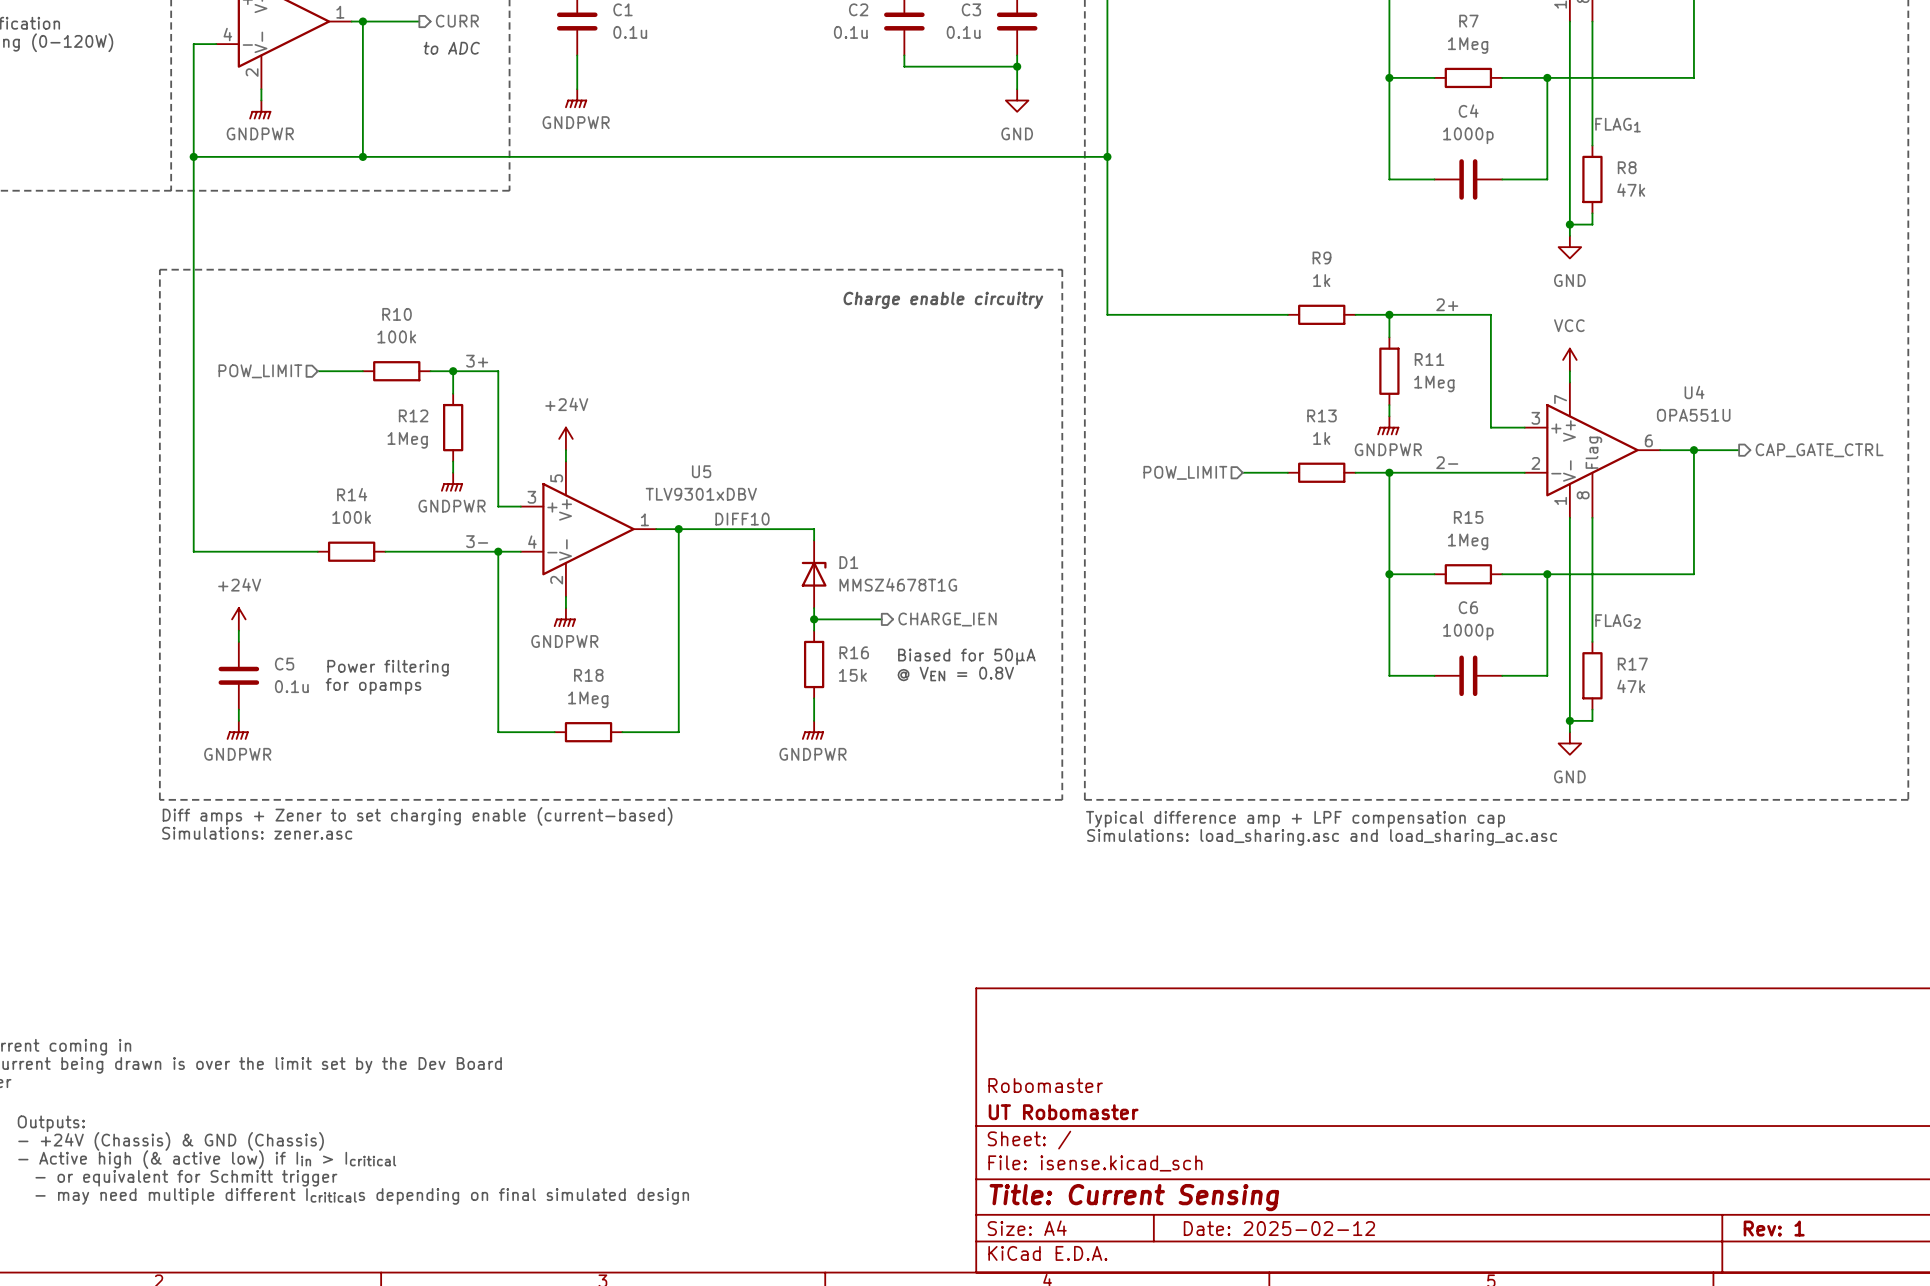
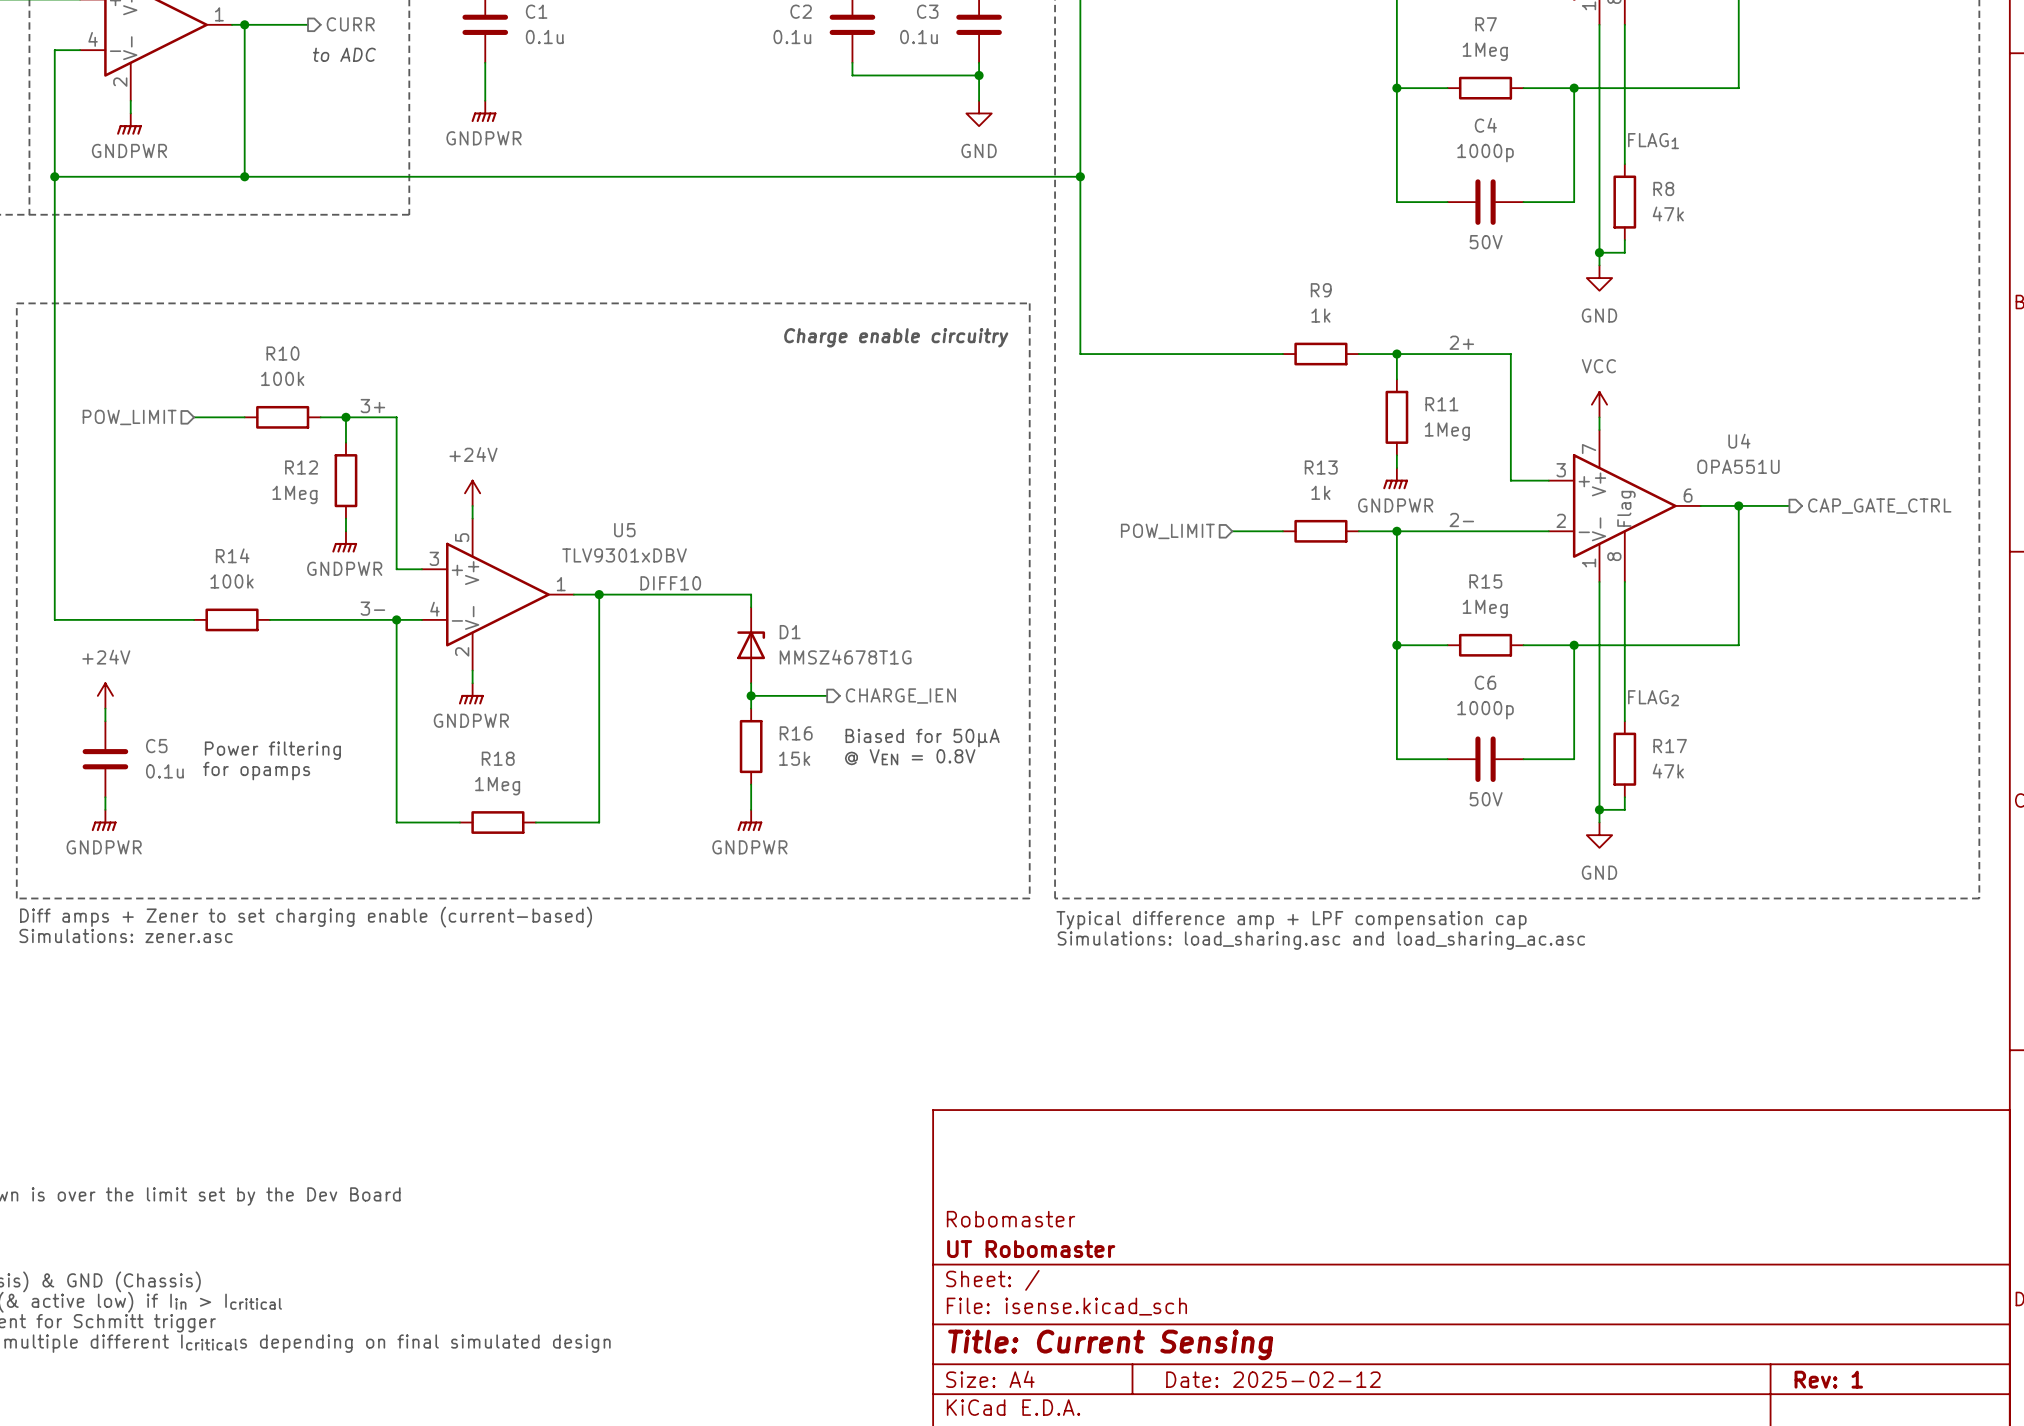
C4 text: none -> 50V (1486, 242)
C6 text: none -> 50V (1486, 799)

